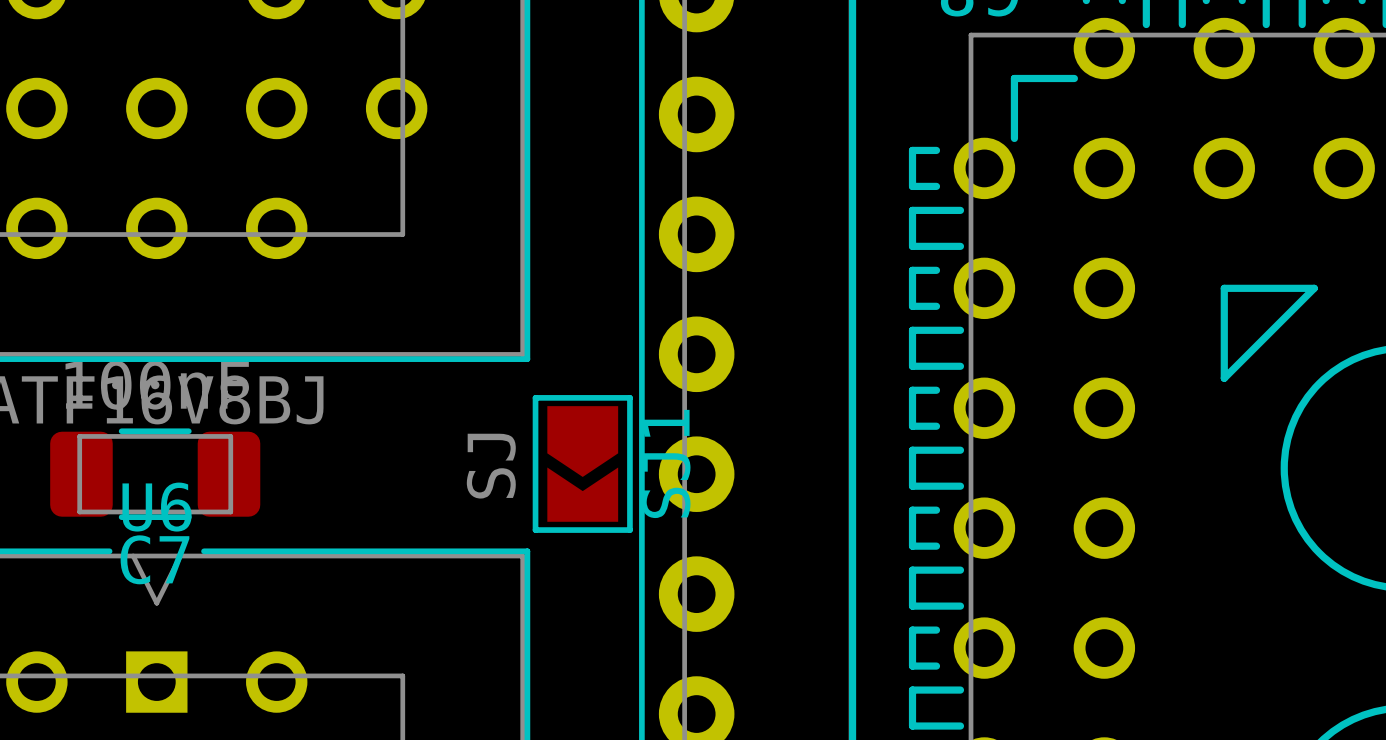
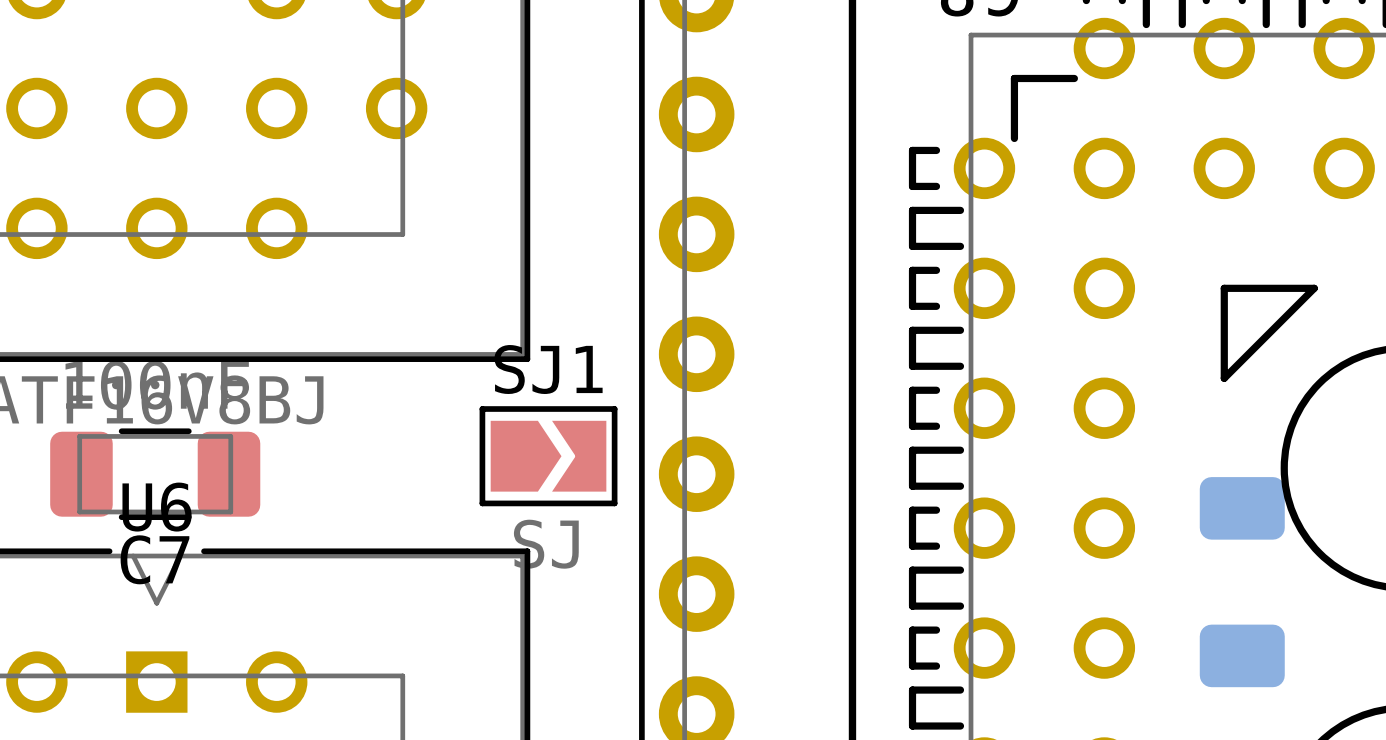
SJ1 rotation: 0° (582, 463) -> 90° counterclockwise (548, 456)
part: none -> (1242, 582)

